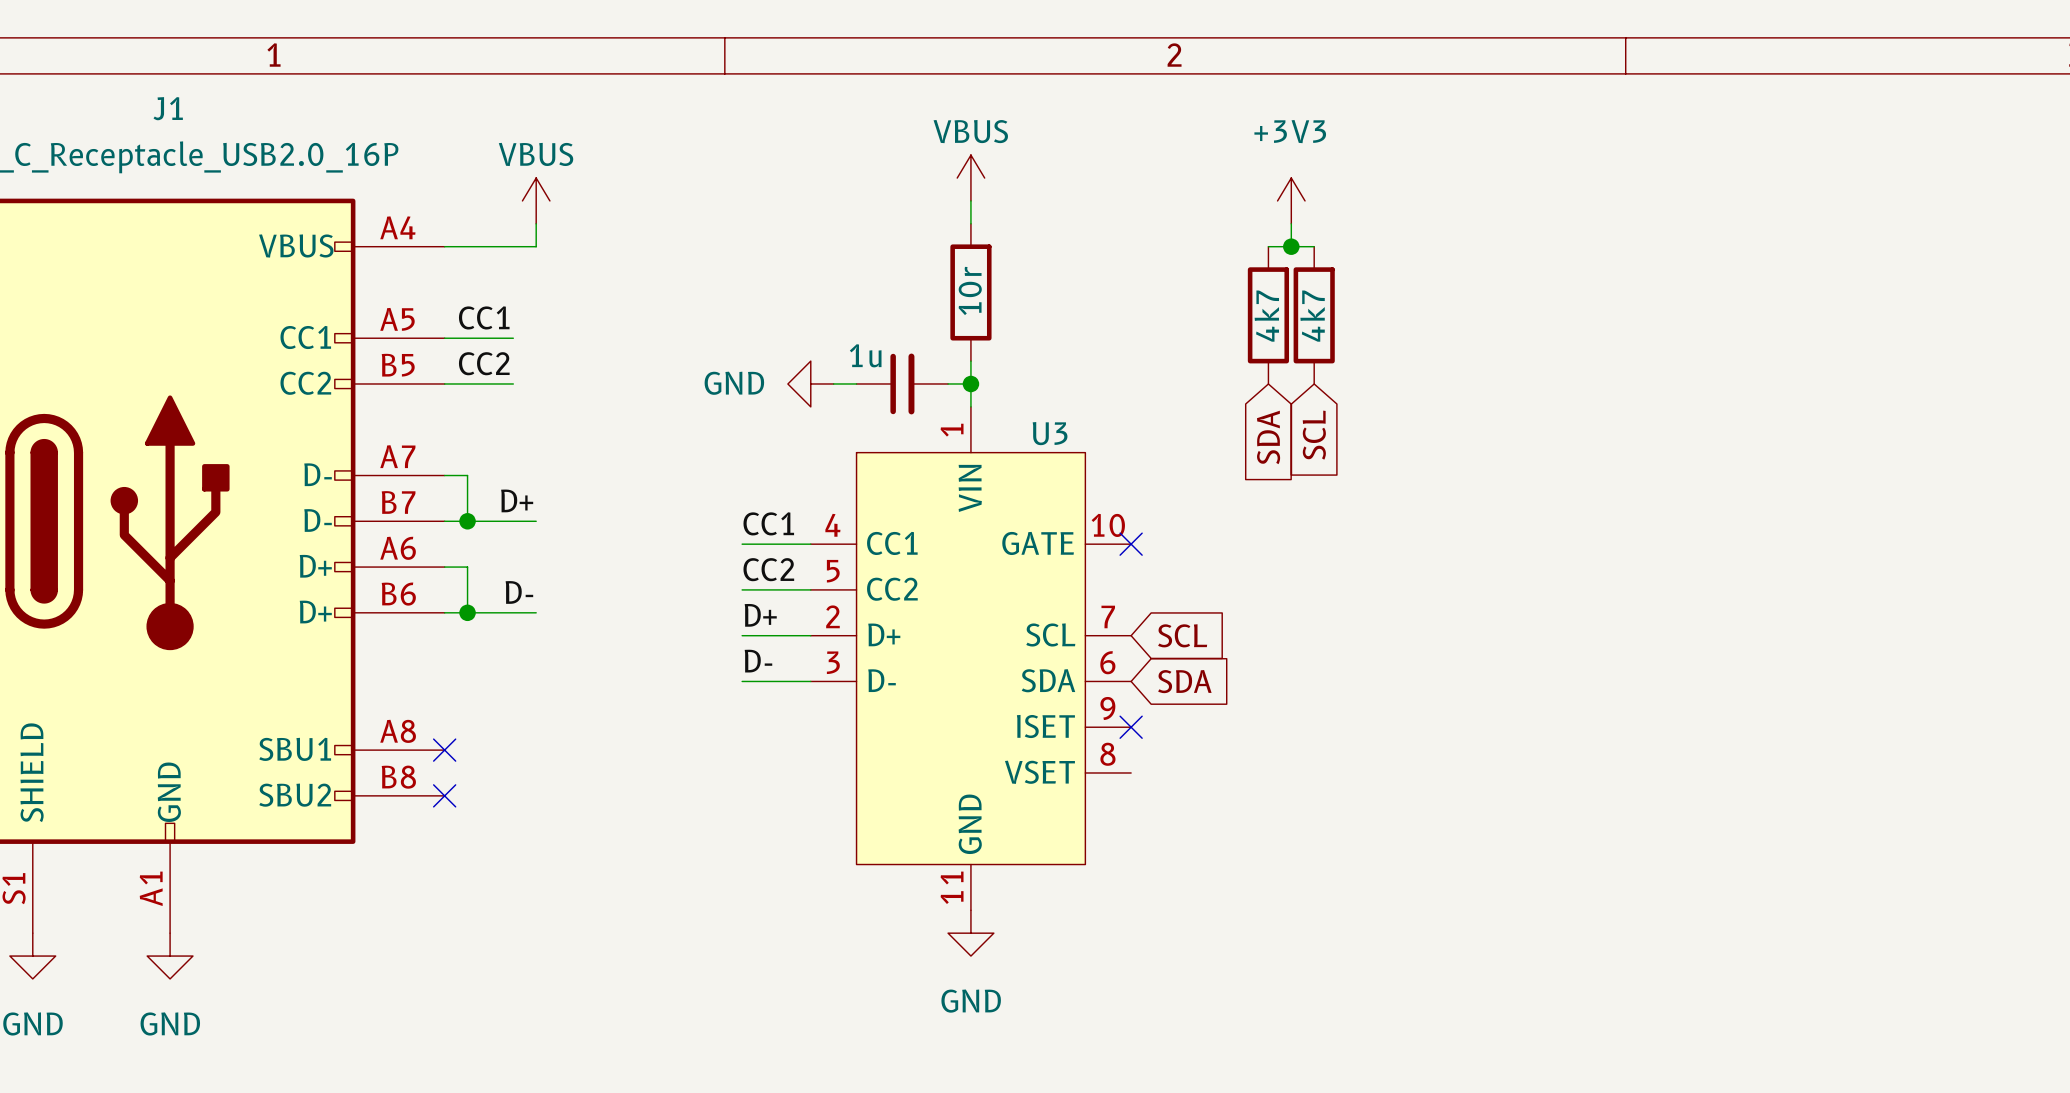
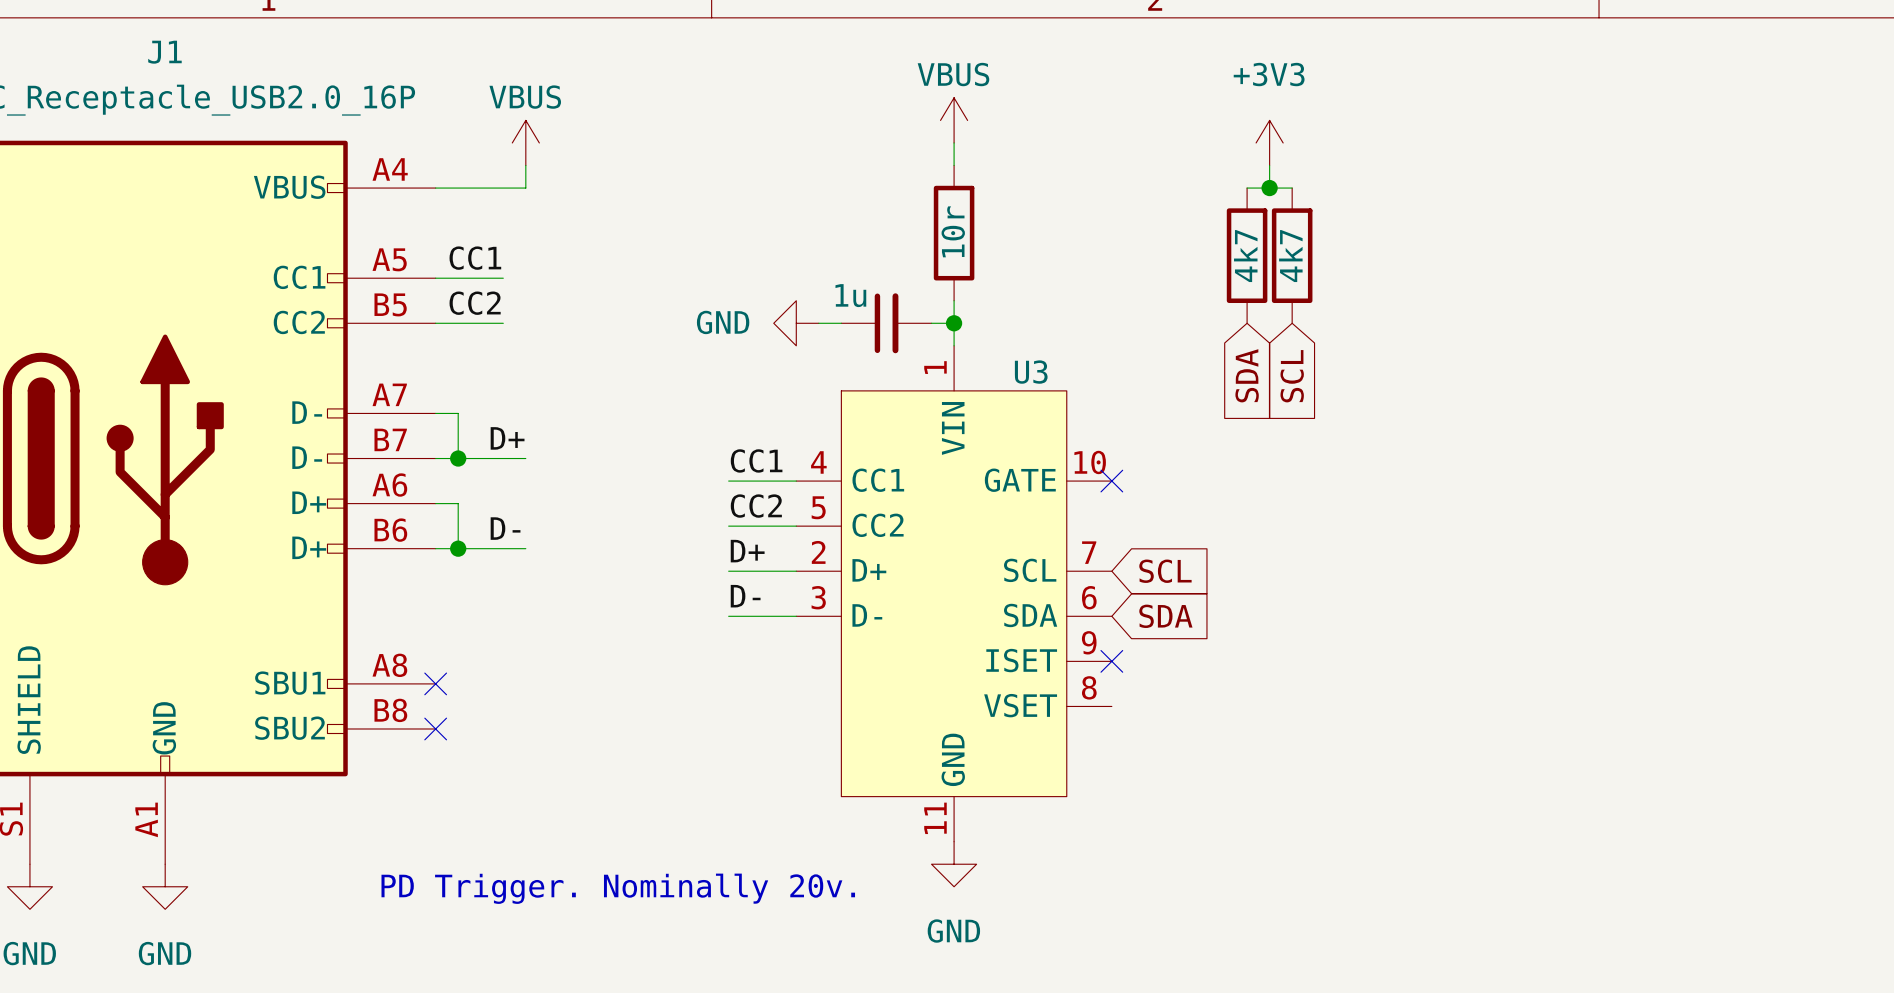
text: none -> PD Trigger. Nominally 20v. (618, 888)

